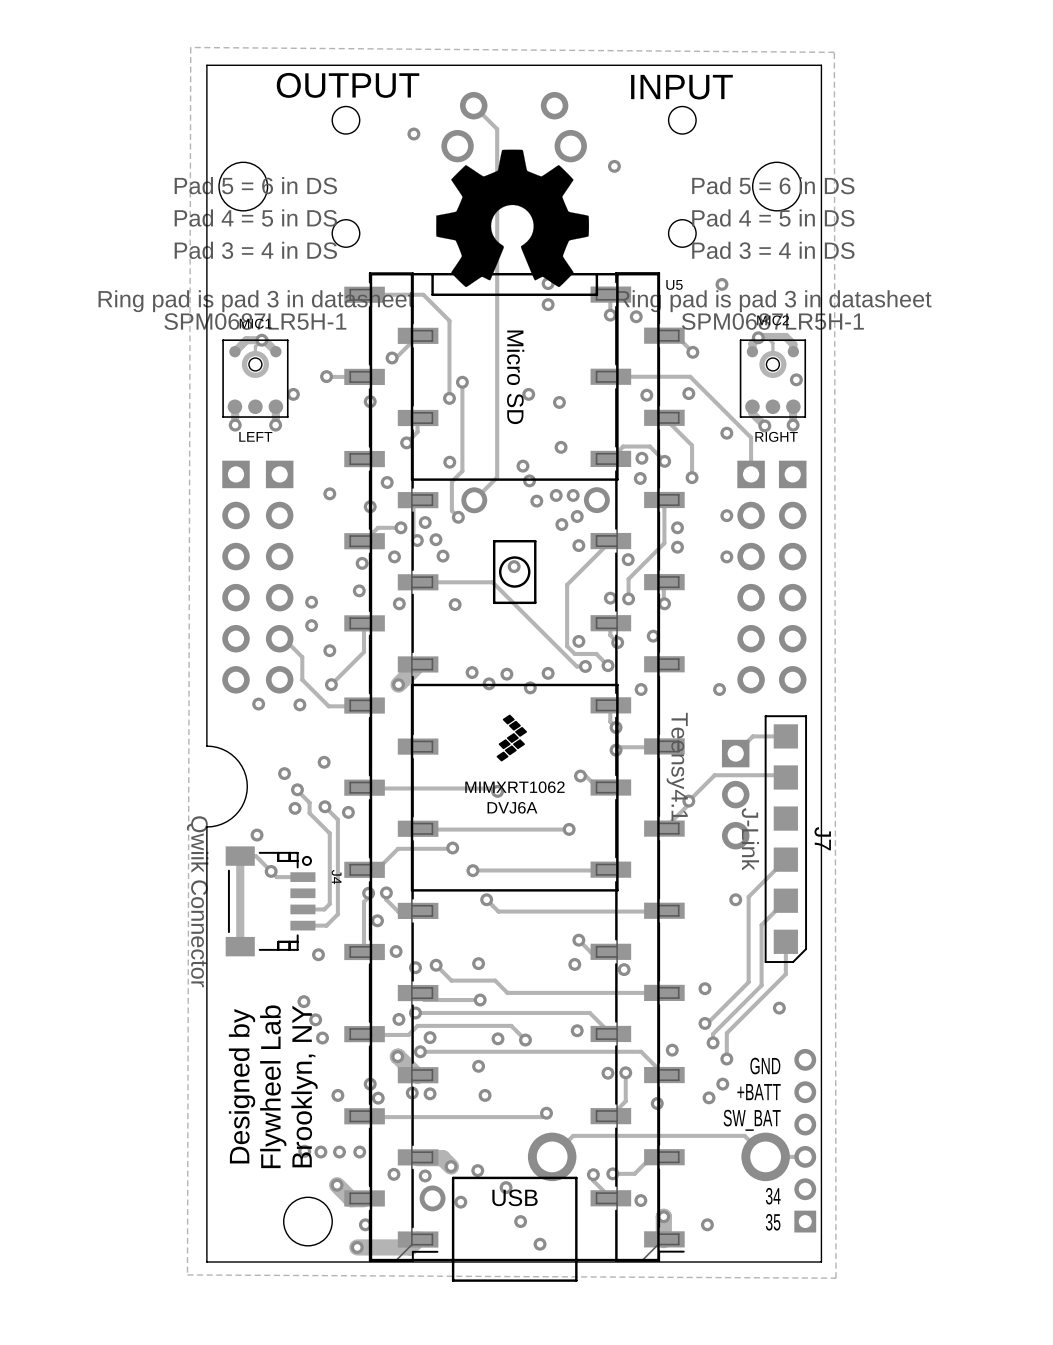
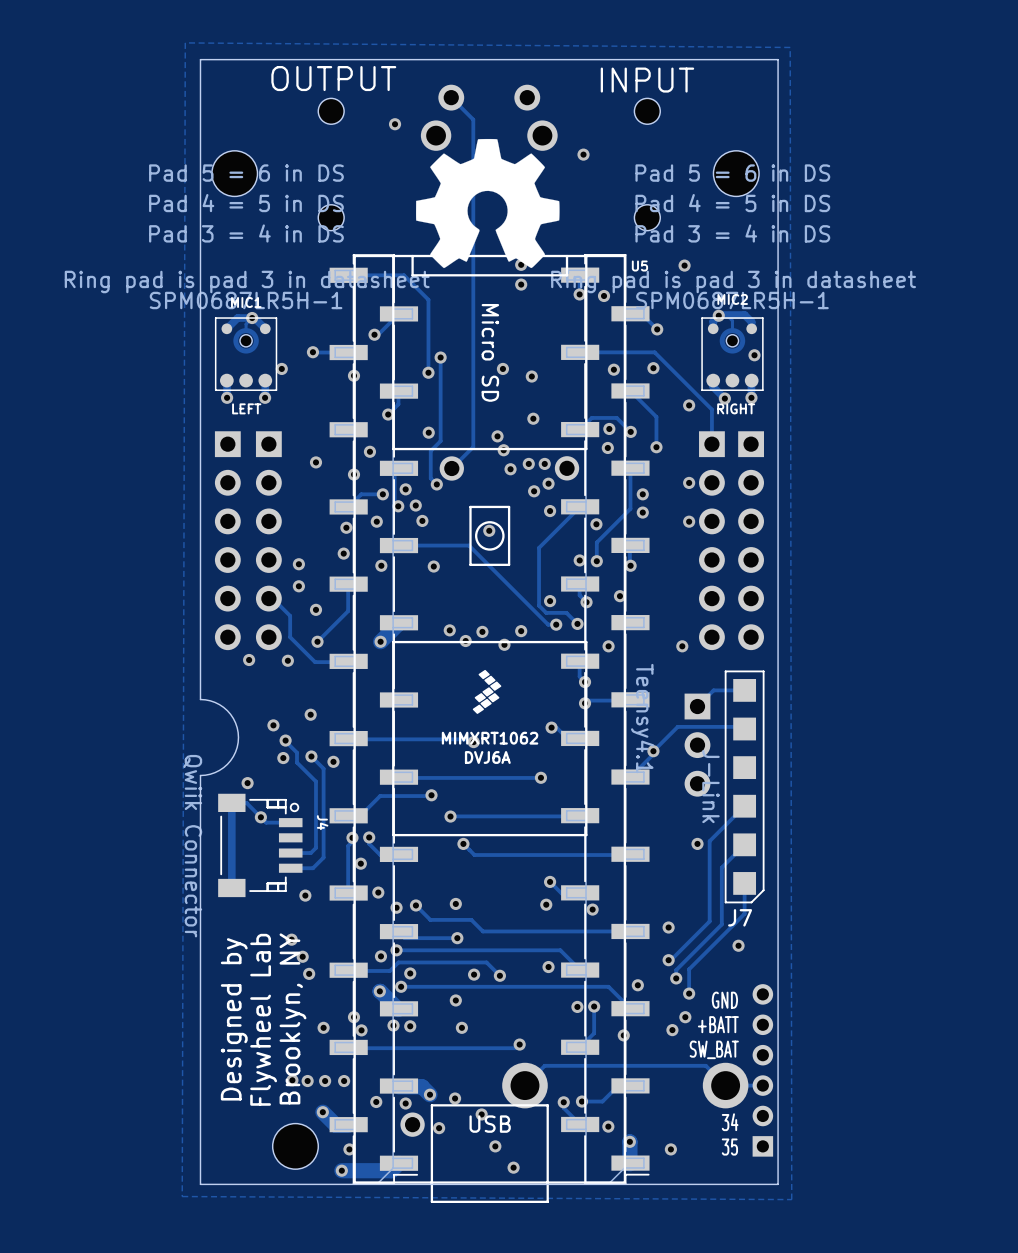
J7 name rotation: 0° (822, 838) -> 90° counterclockwise (740, 917)
J7 name position: J7 (822, 838) -> J7 (740, 917)

